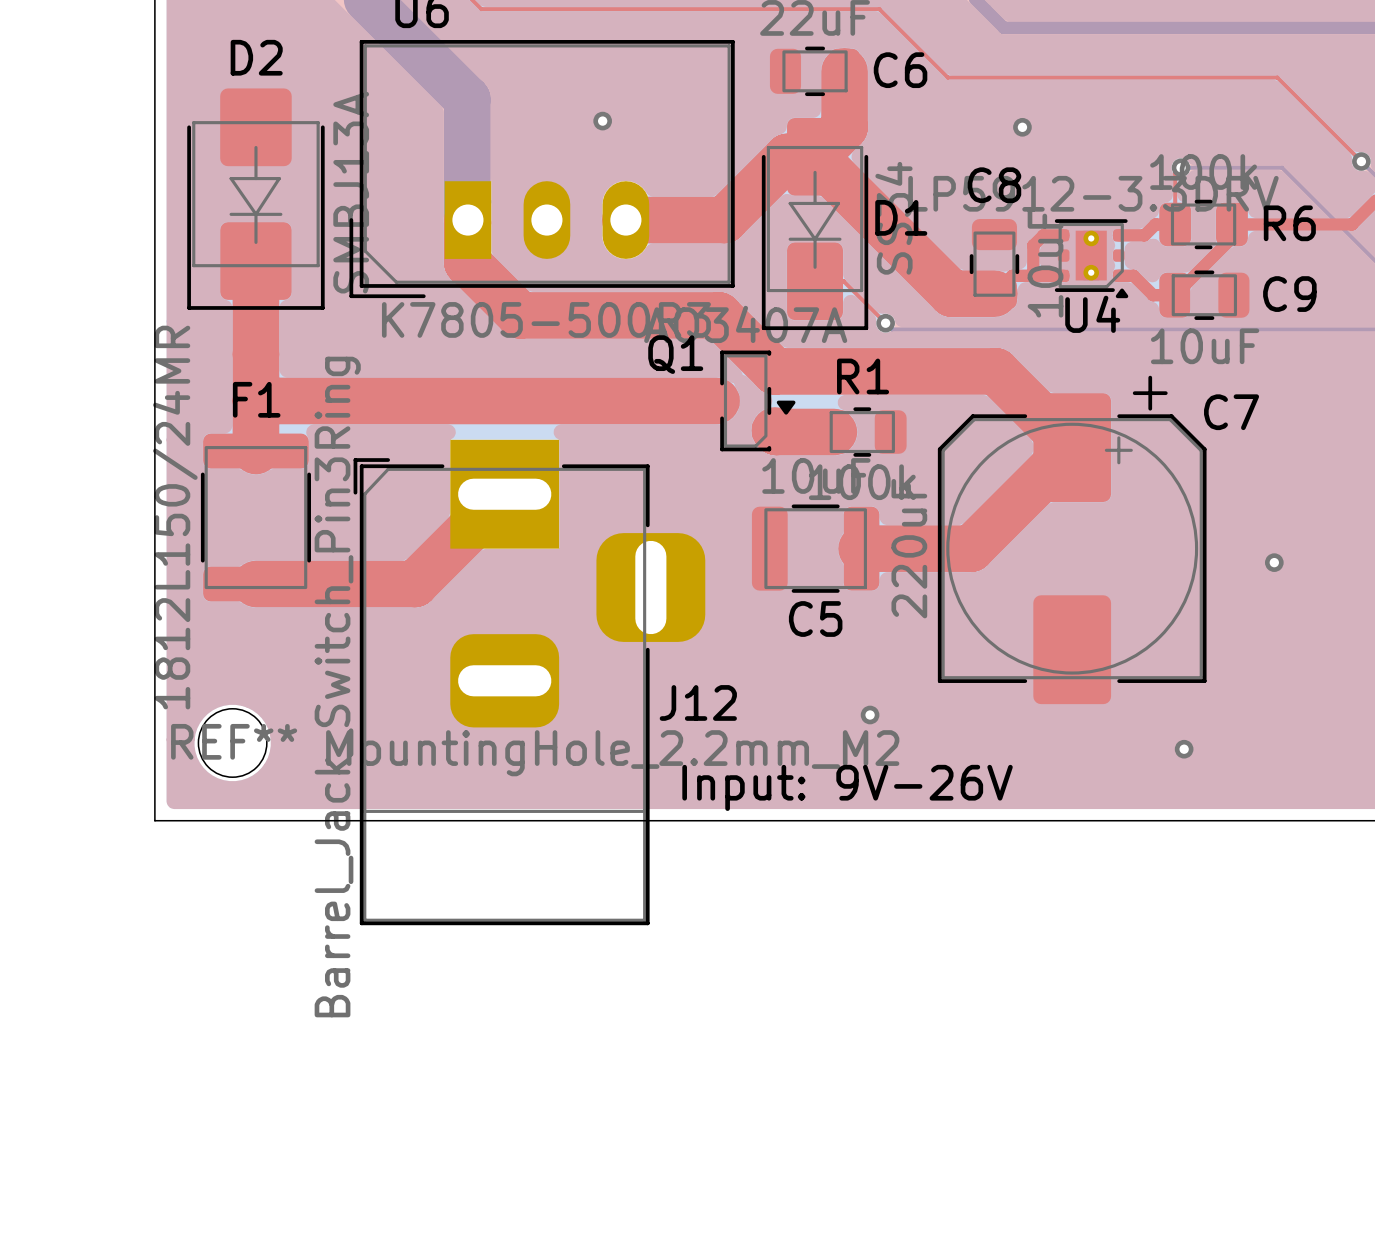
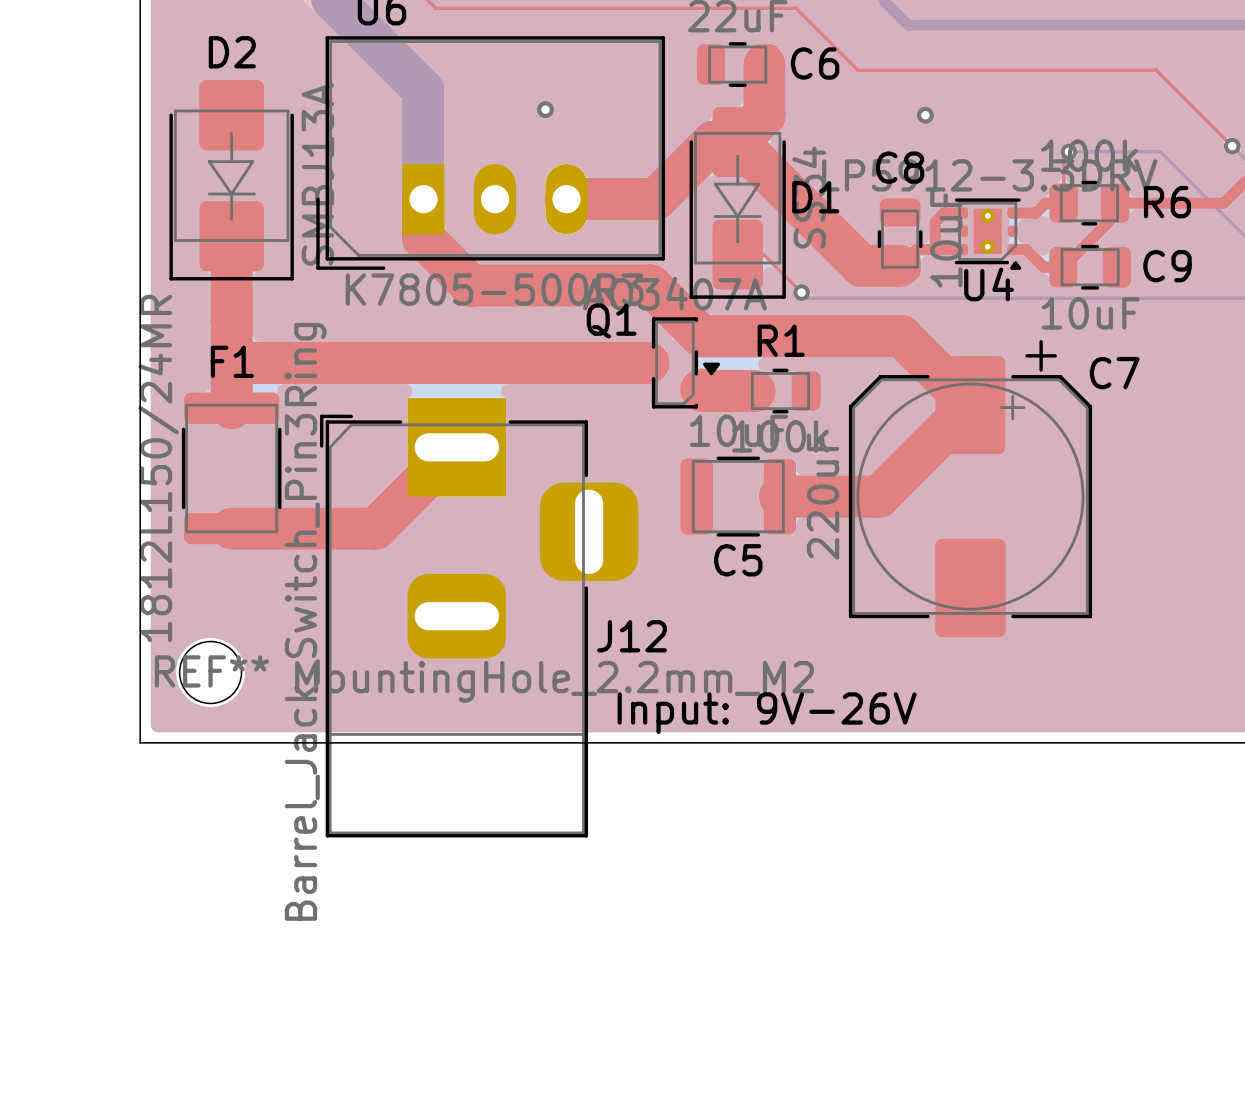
via: (1274, 562) -> none
via: (870, 715) -> none
via: (1184, 749) -> none

